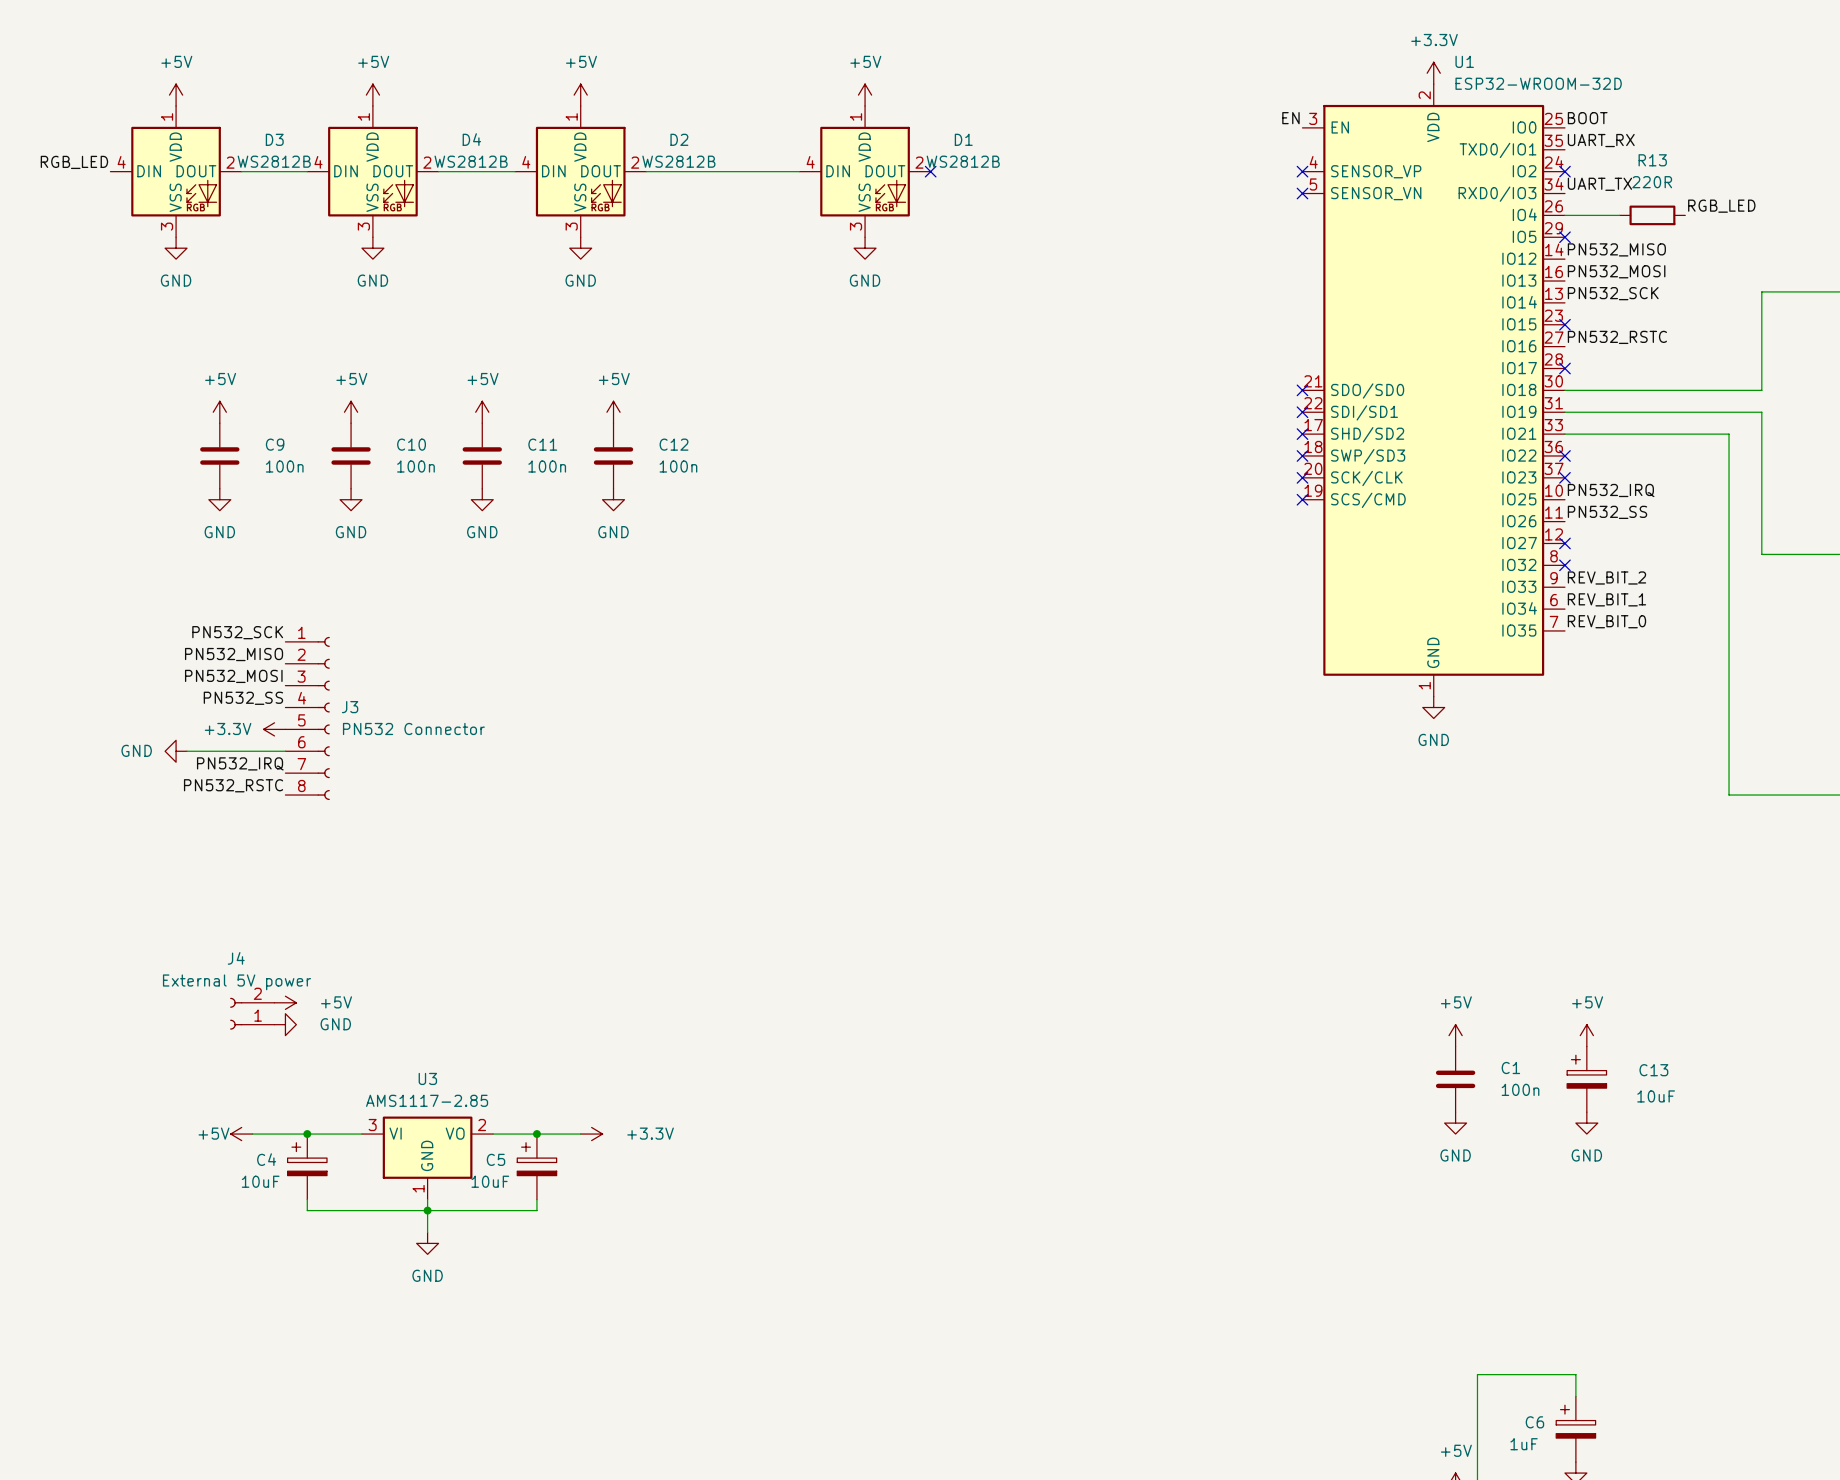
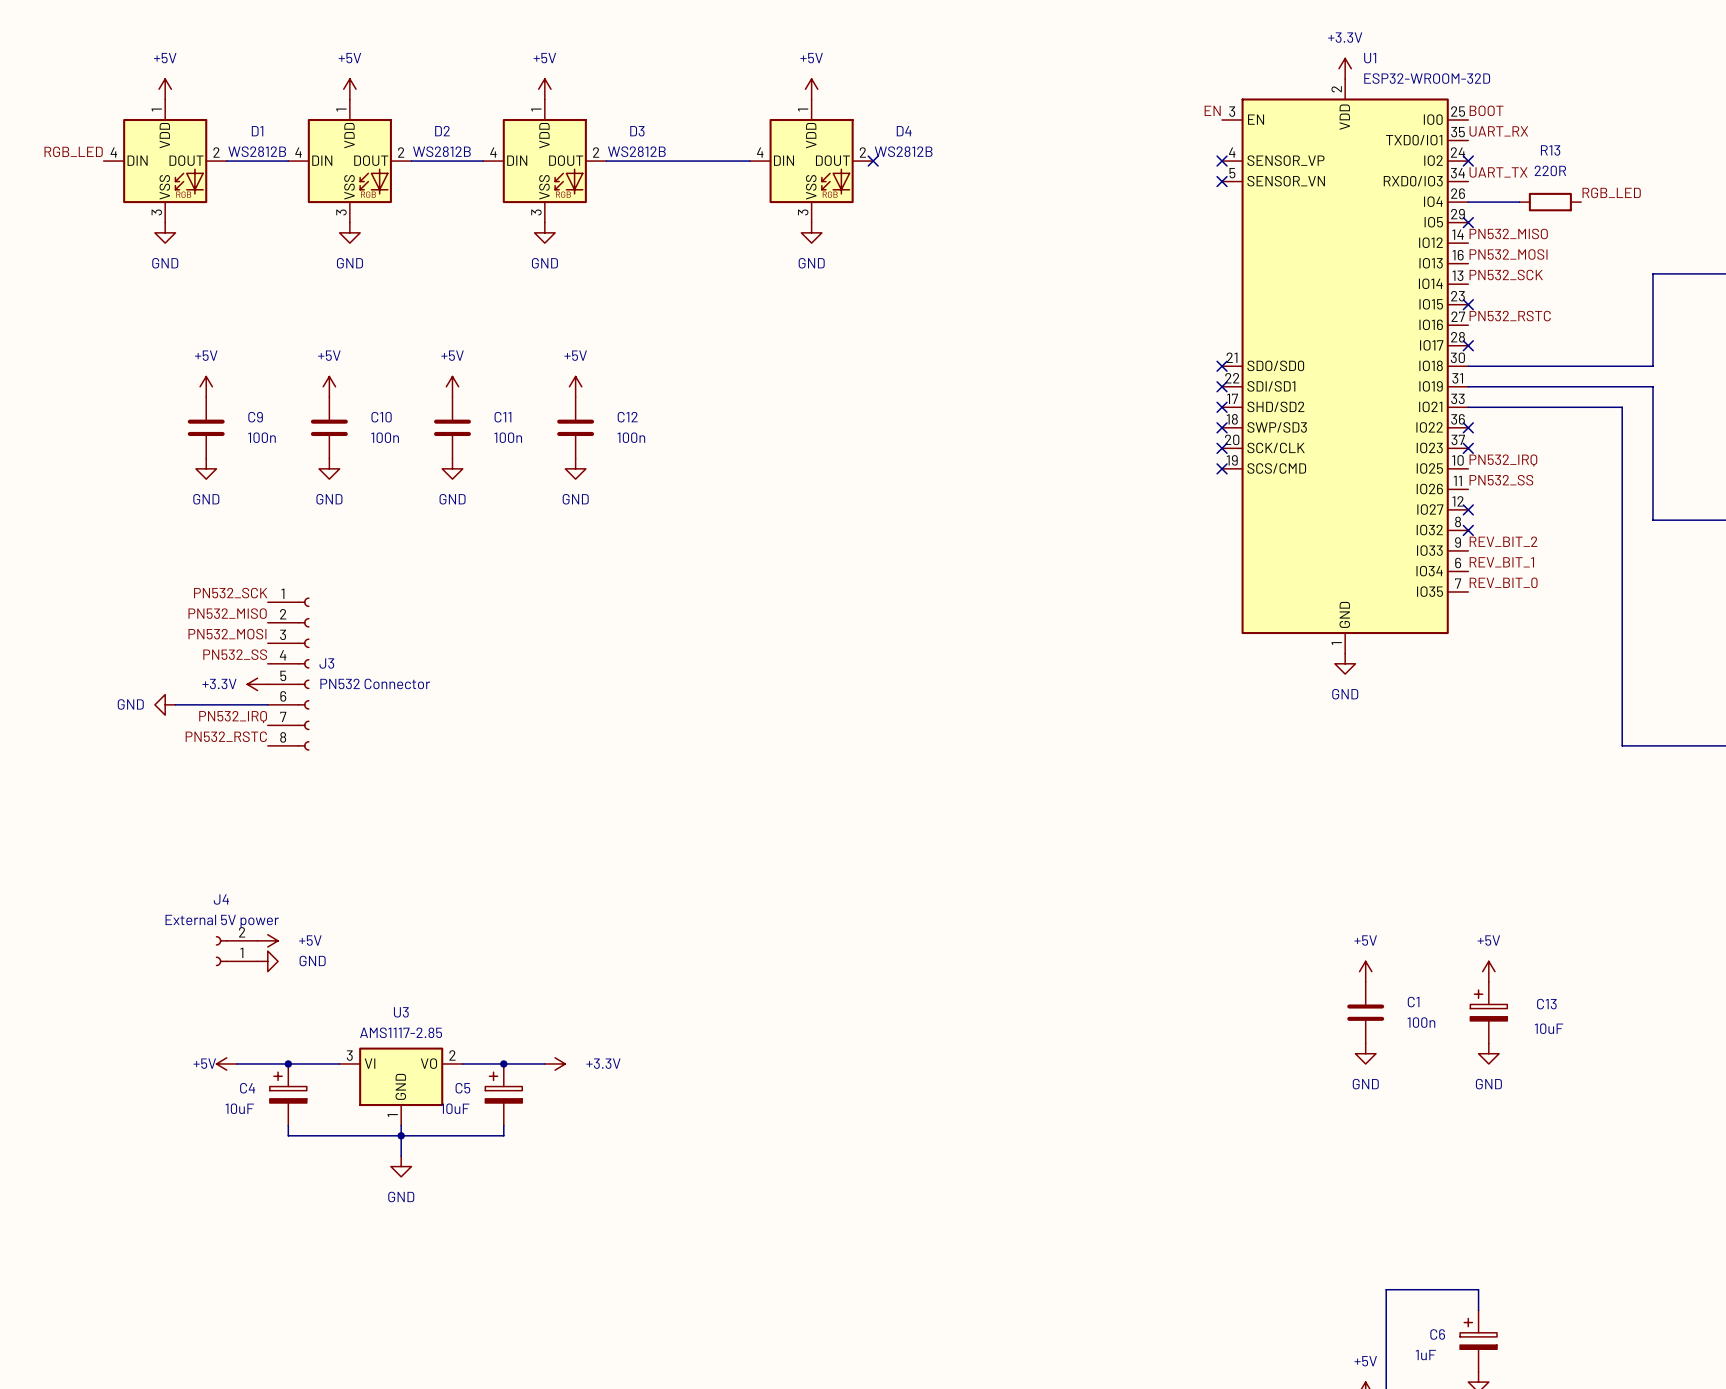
D3 name: D3 (274, 139) -> D1 (257, 131)
D4 name: D4 (471, 139) -> D2 (442, 131)
D2 name: D2 (679, 139) -> D3 (637, 131)
D1 name: D1 (963, 139) -> D4 (904, 131)

